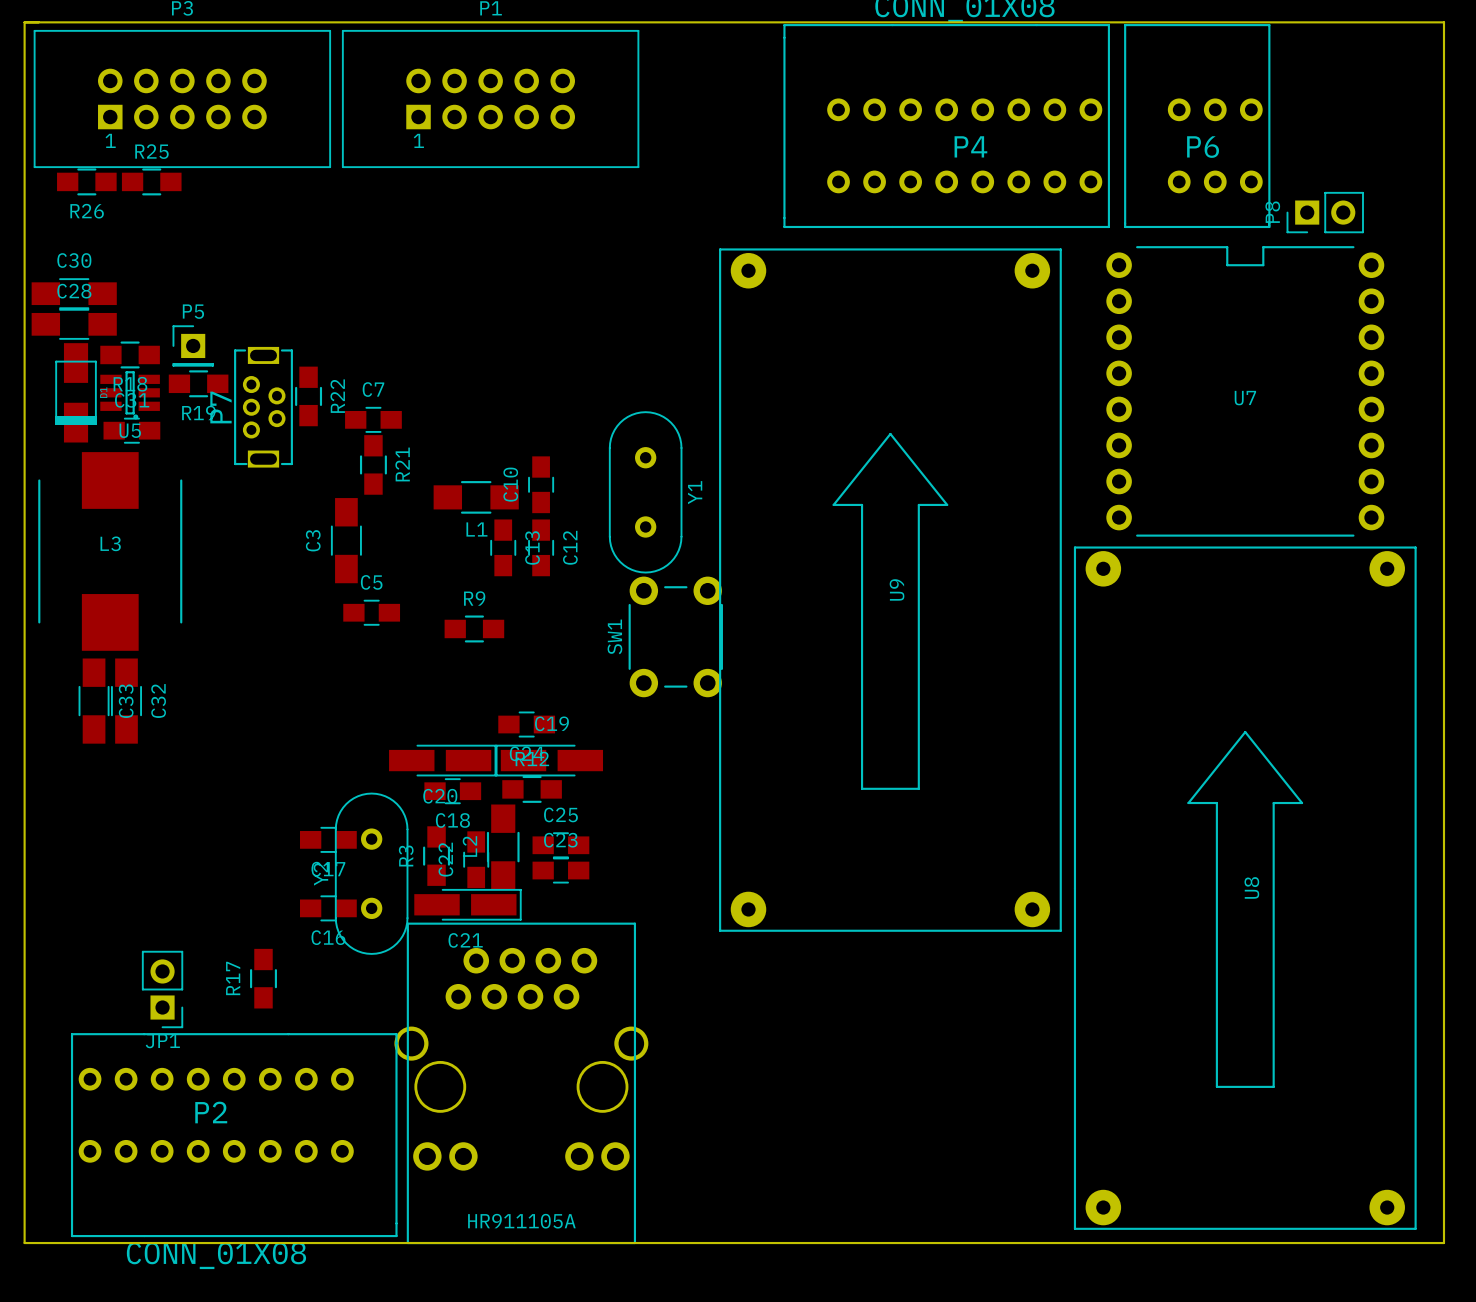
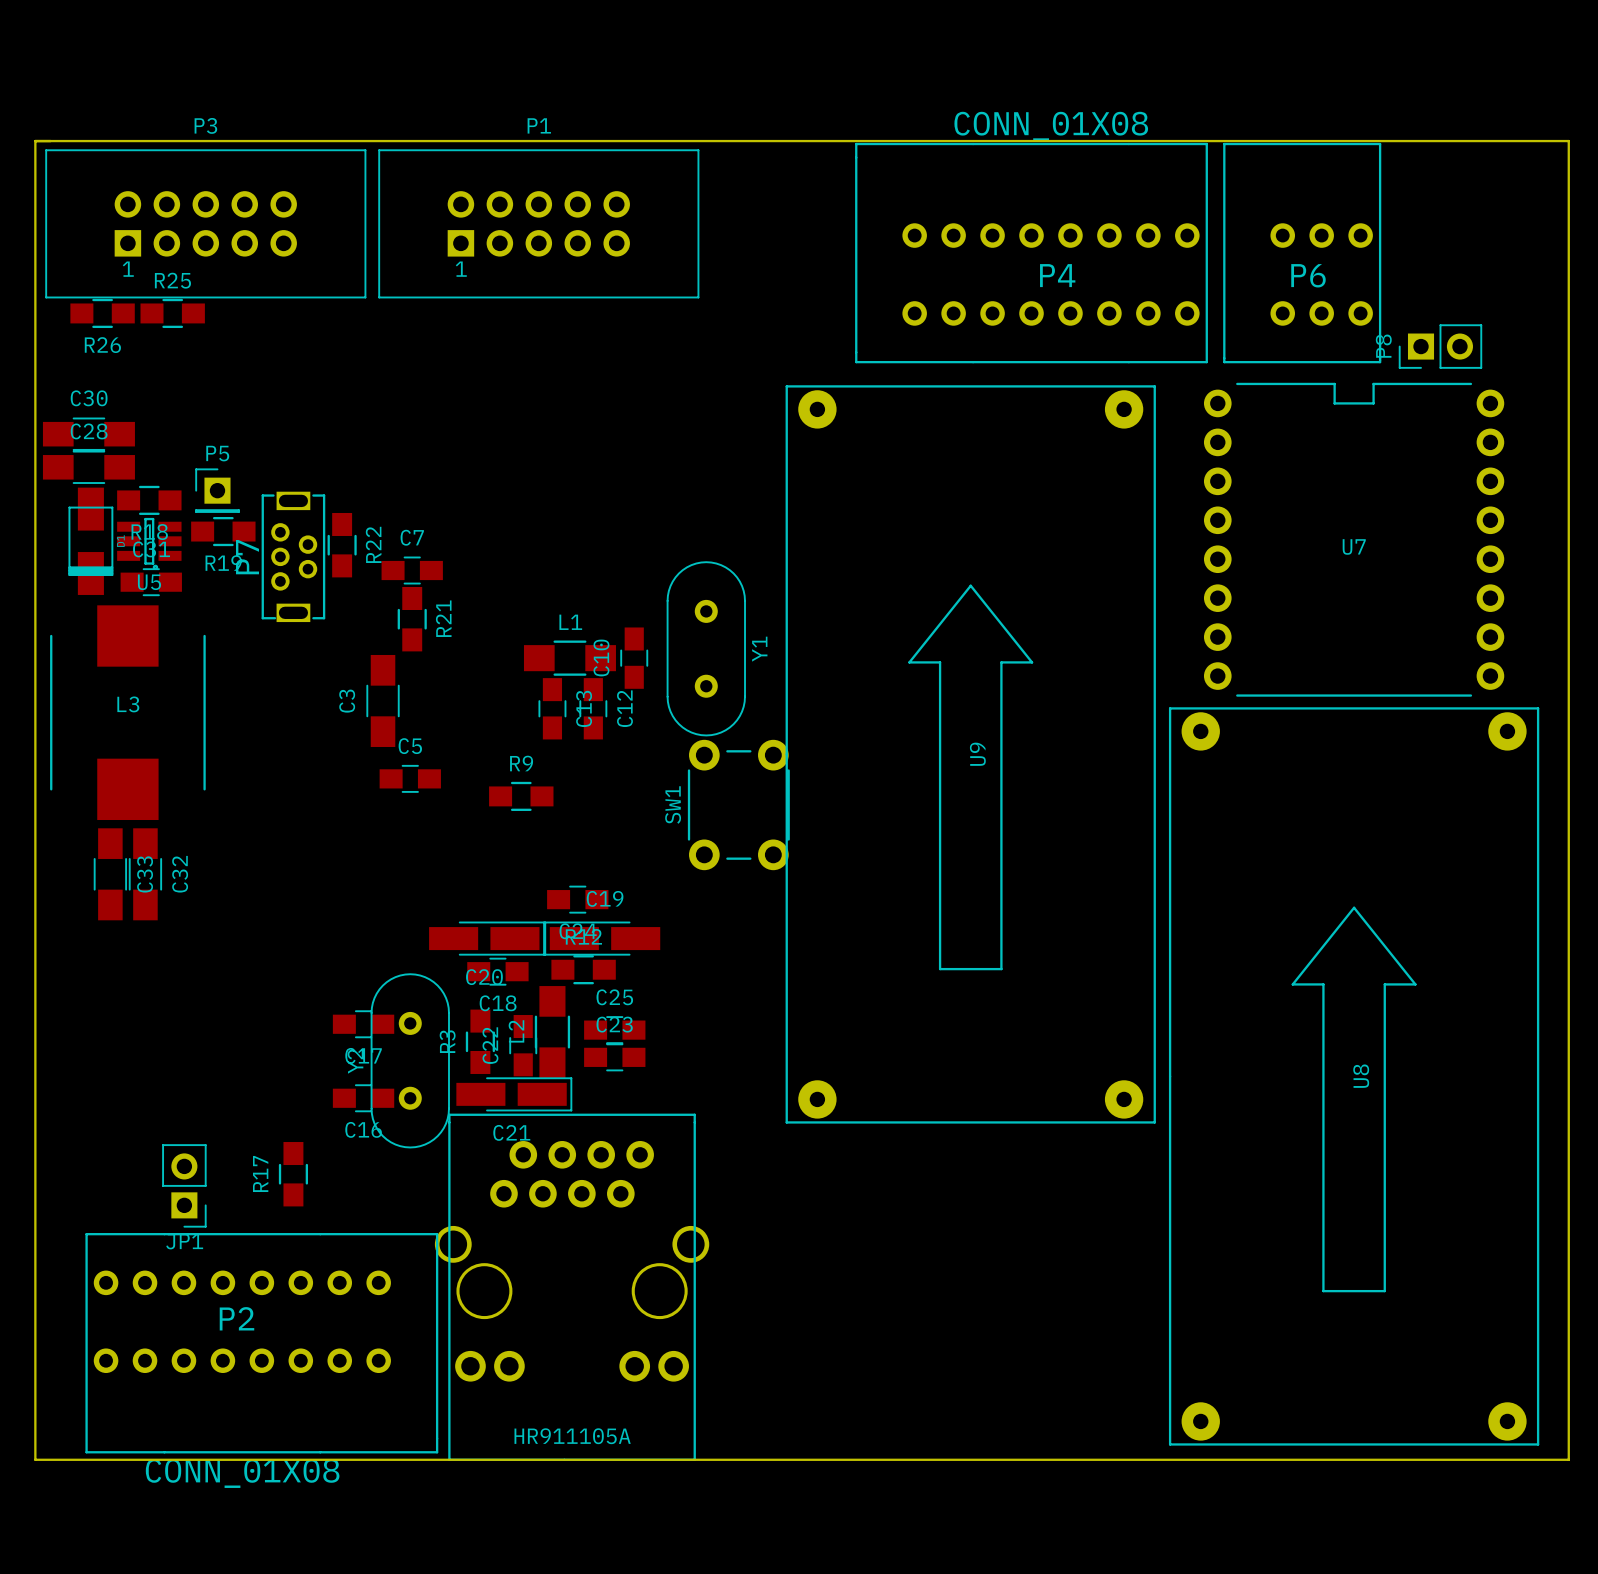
C10 position: (541, 484) -> (634, 658)
L1 position: (476, 497) -> (569, 658)
L1 name position: L1 (476, 529) -> L1 (570, 622)

